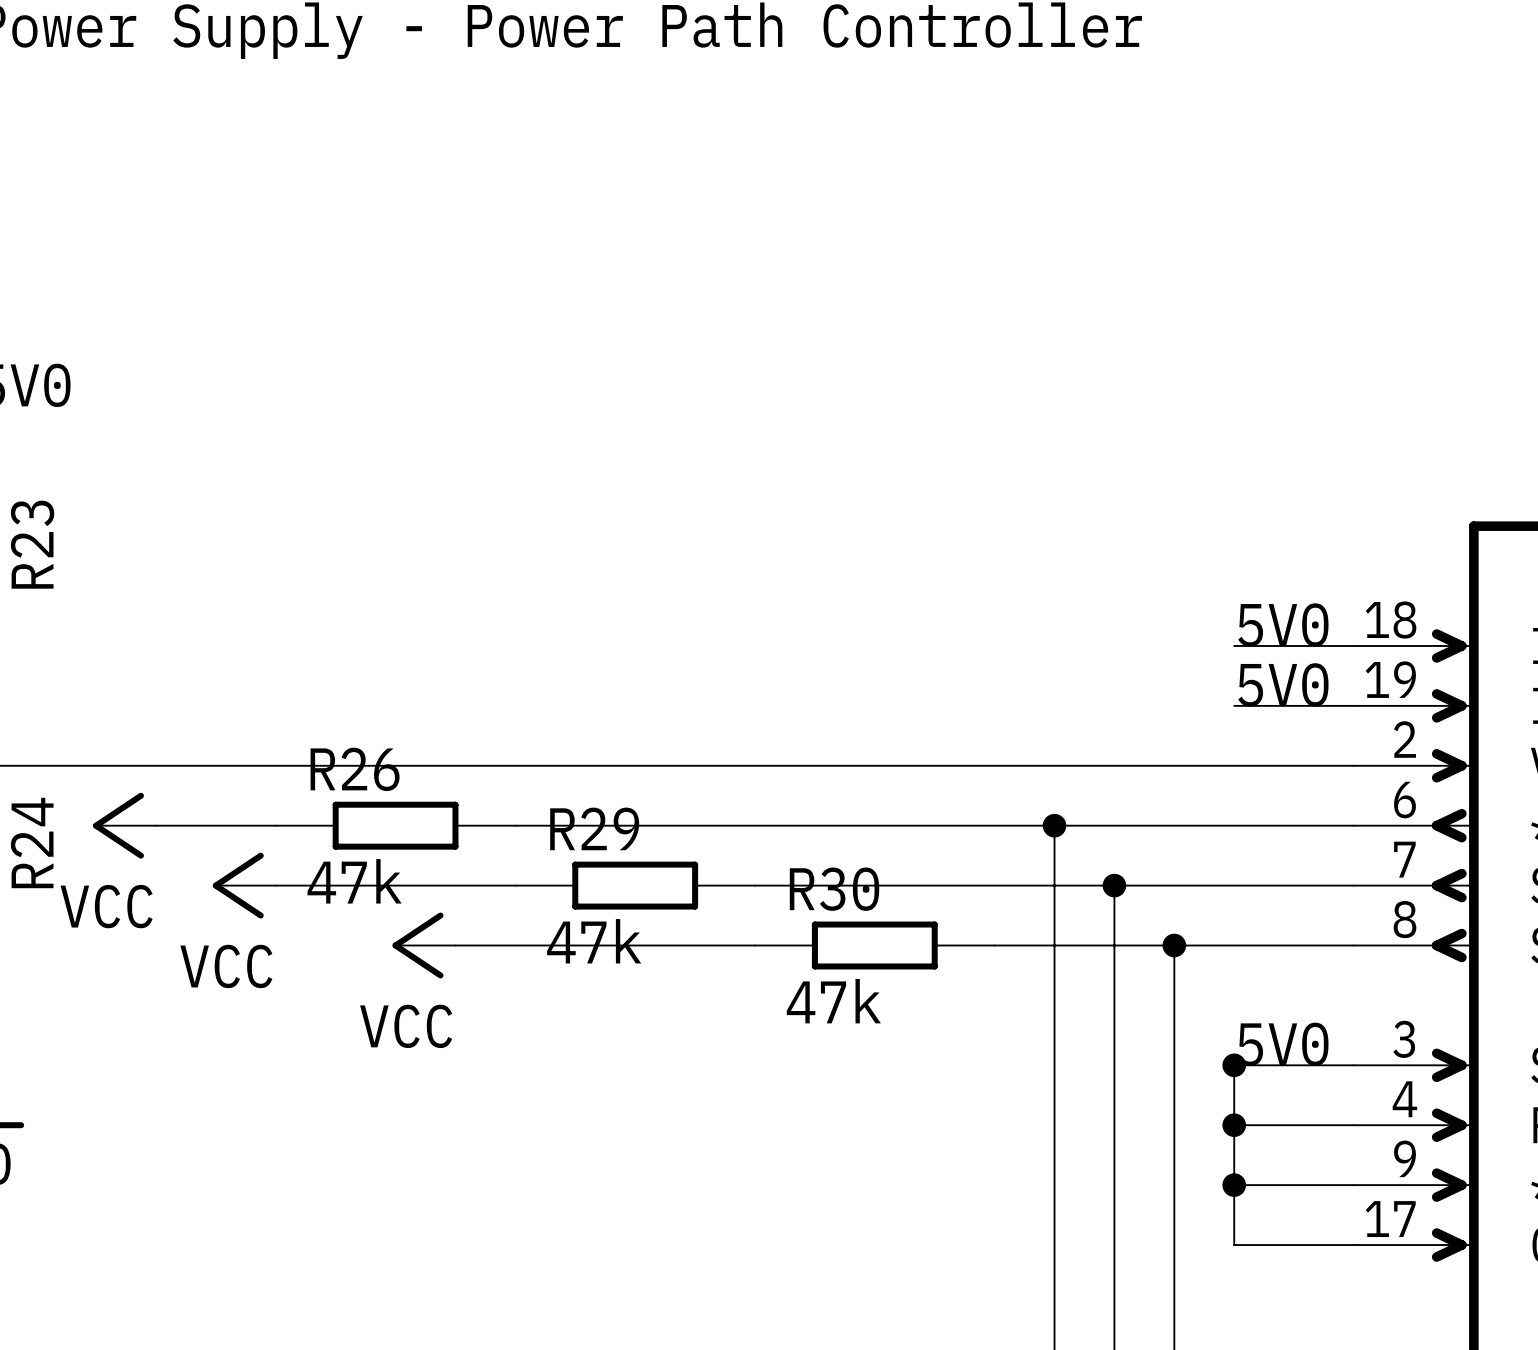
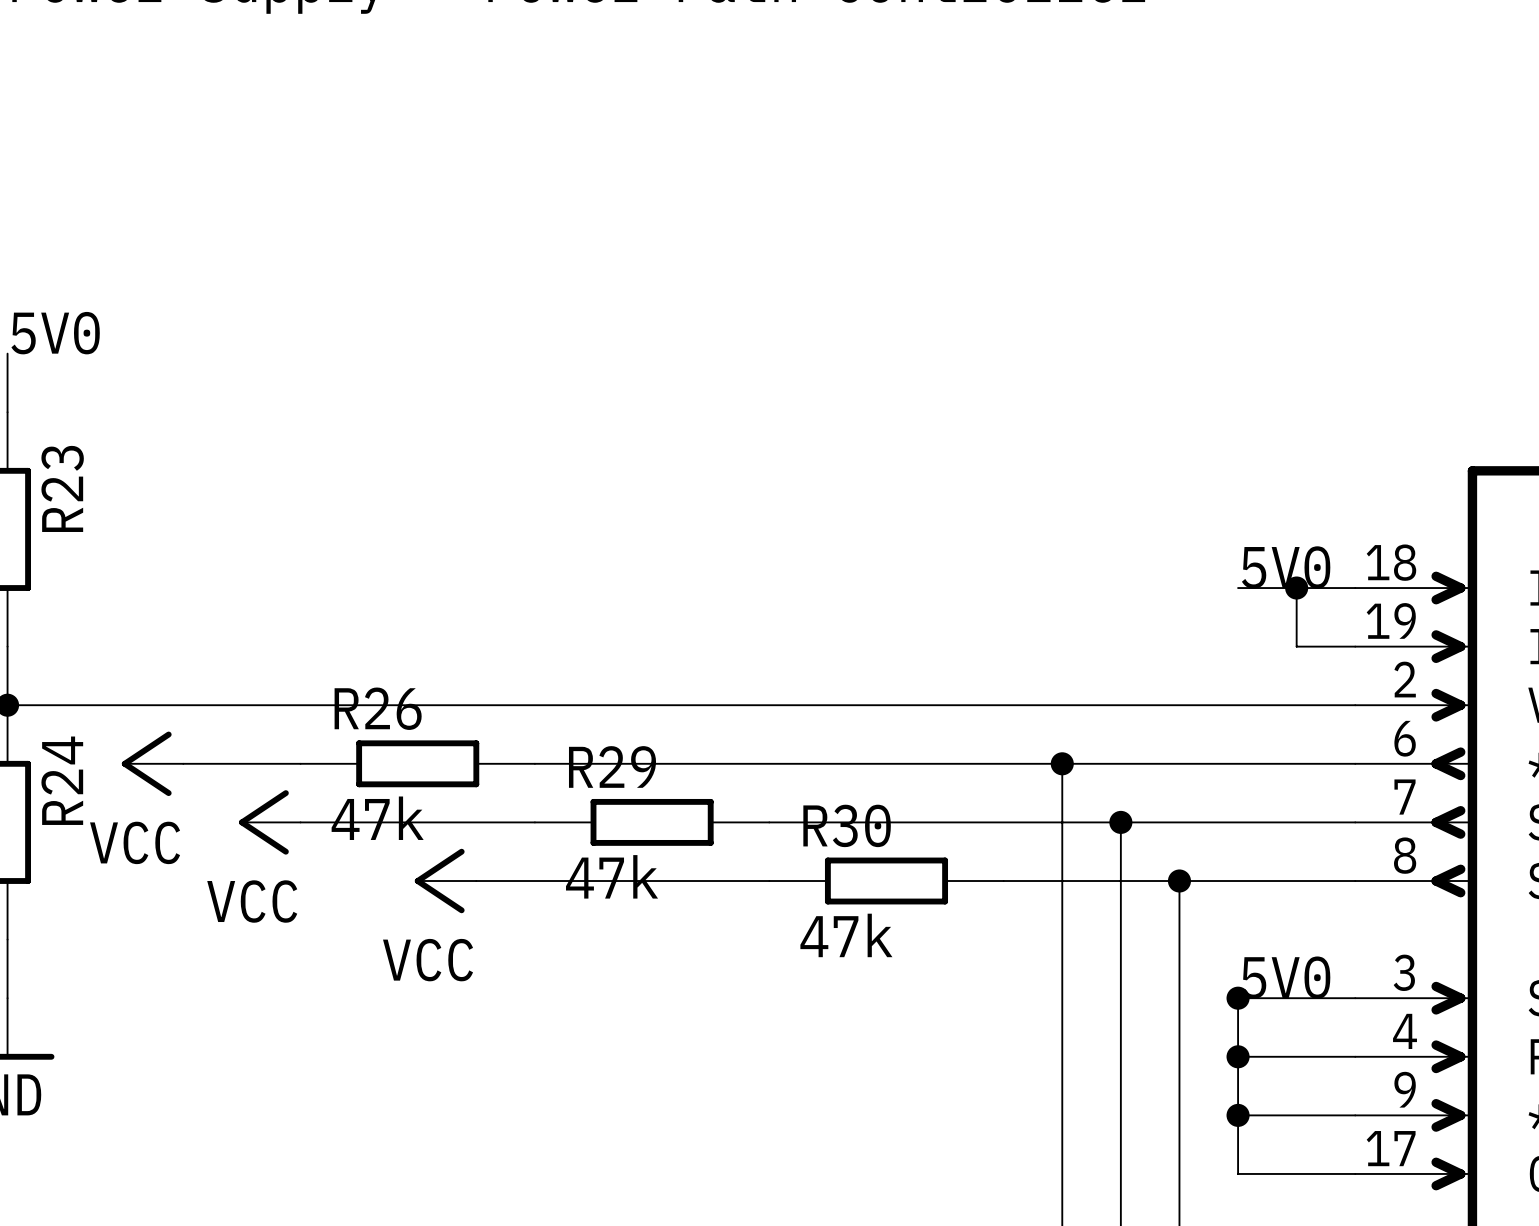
junction: none -> (1296, 588)
label: 5V0 (1283, 684) -> none
wire: (1234, 705) (1294, 705) -> (1296, 588) (1296, 646)

